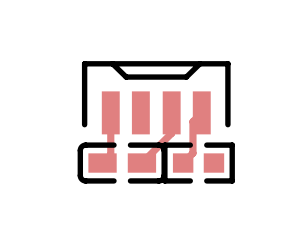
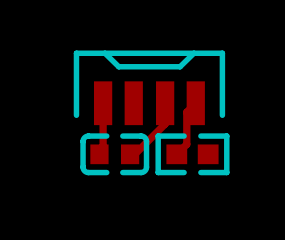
part footprint: [77, 142, 167, 184] -> [80, 133, 150, 176]

